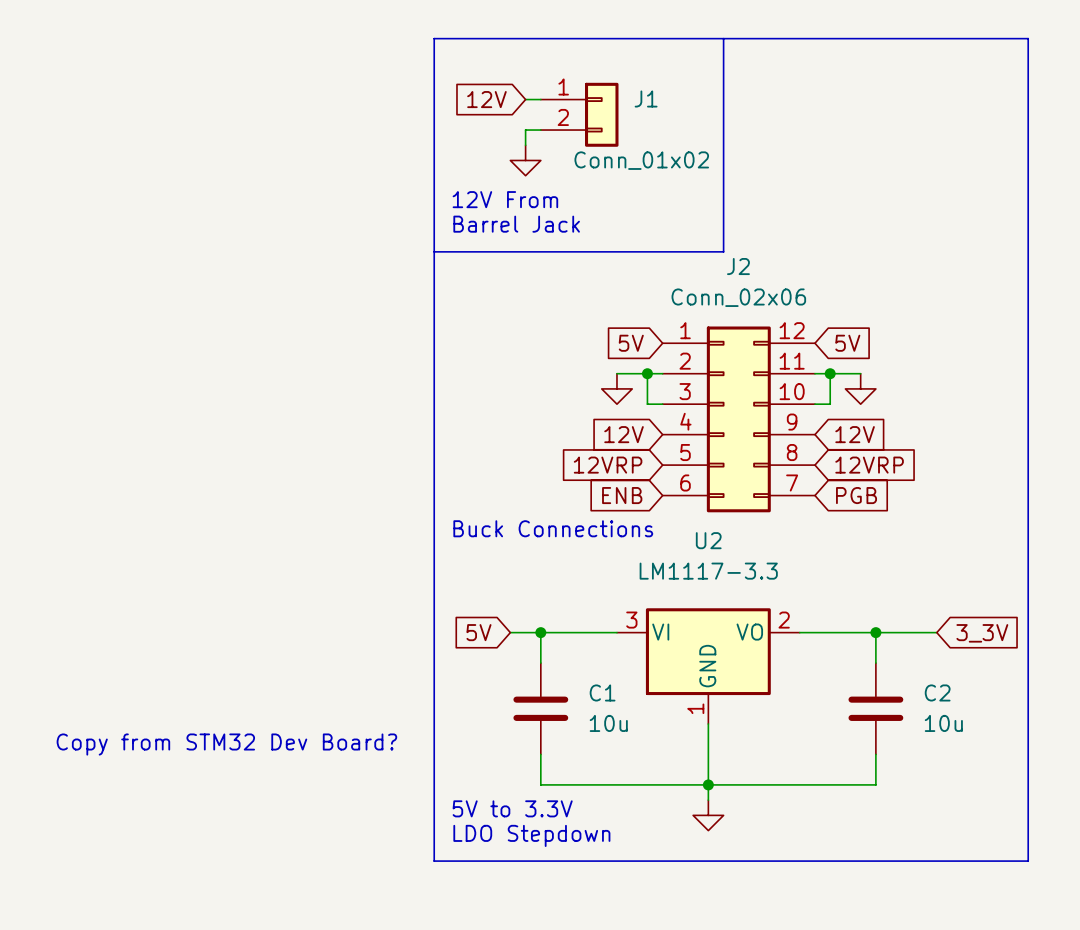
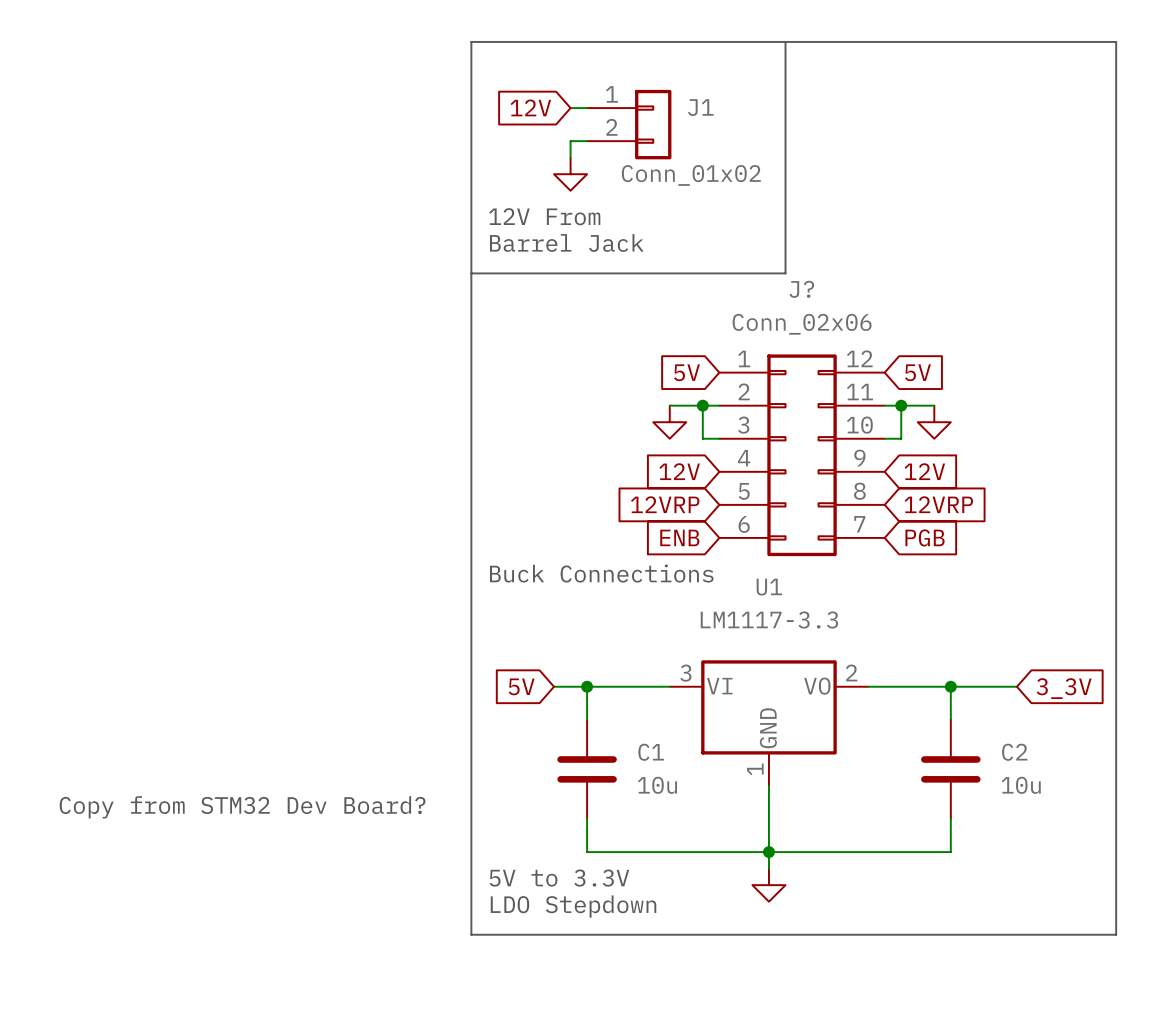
J2 name: J2 (738, 266) -> J? (801, 289)
U2 name: U2 (708, 540) -> U1 (769, 587)

